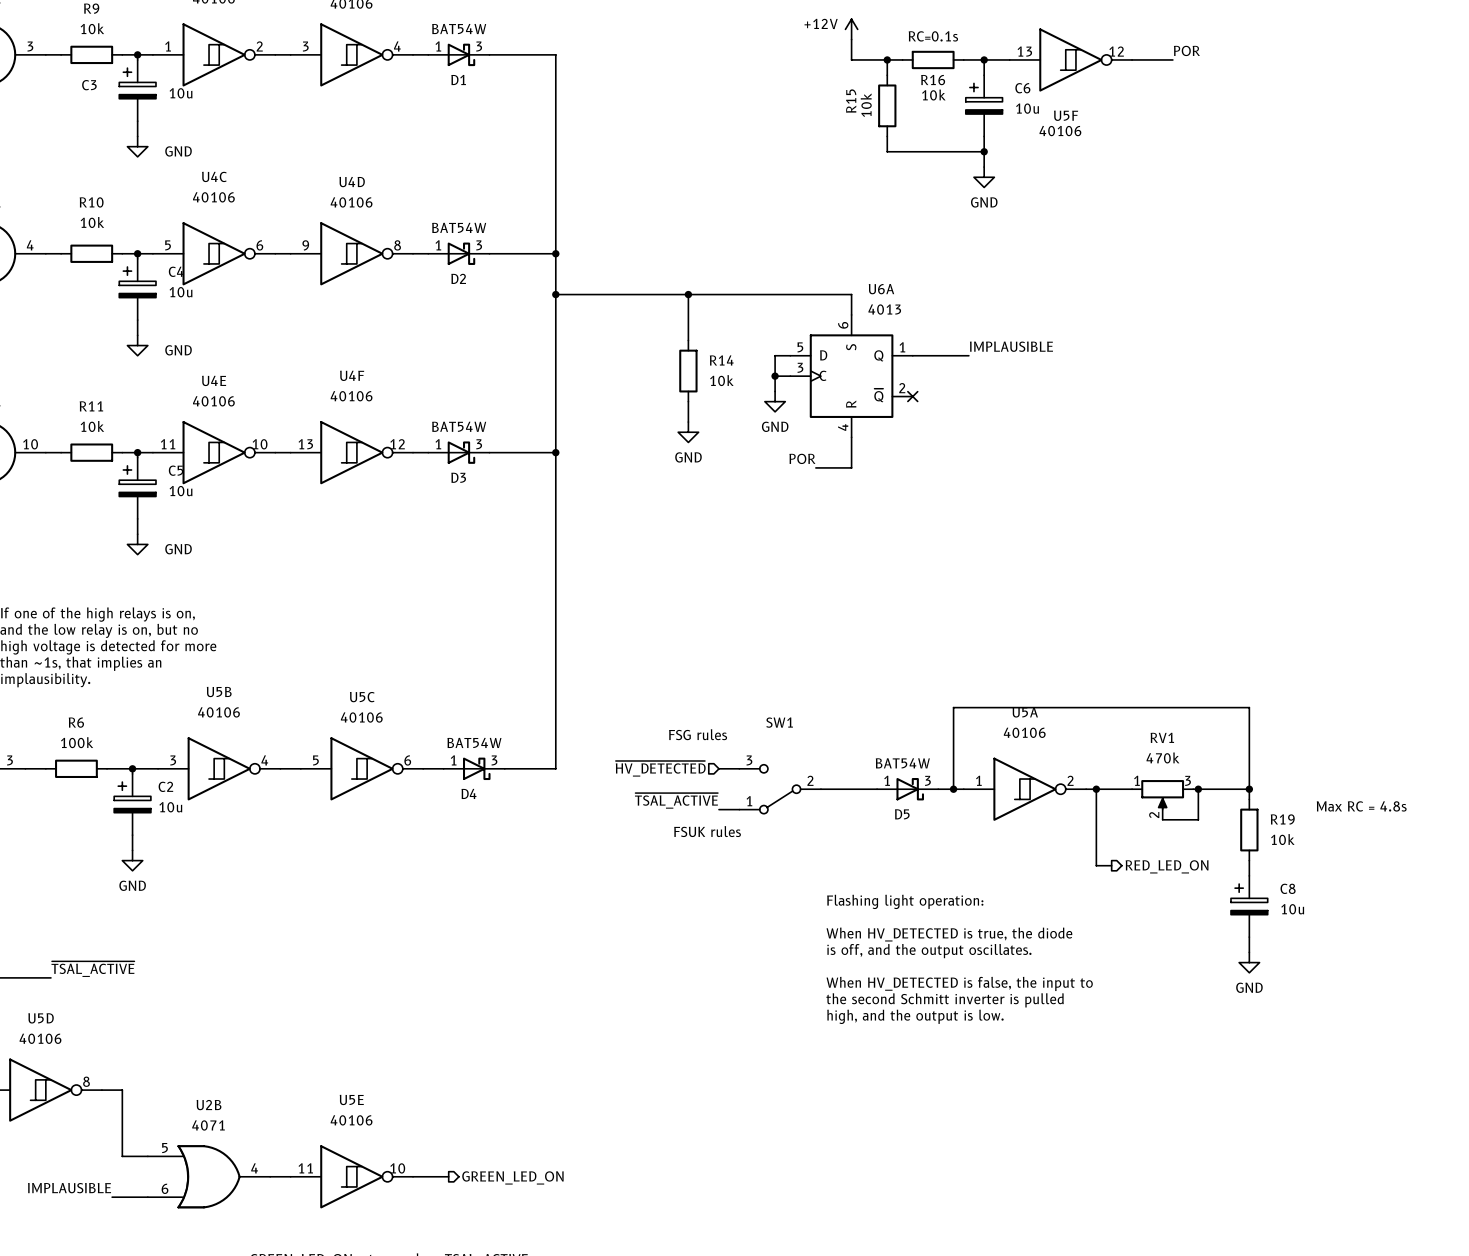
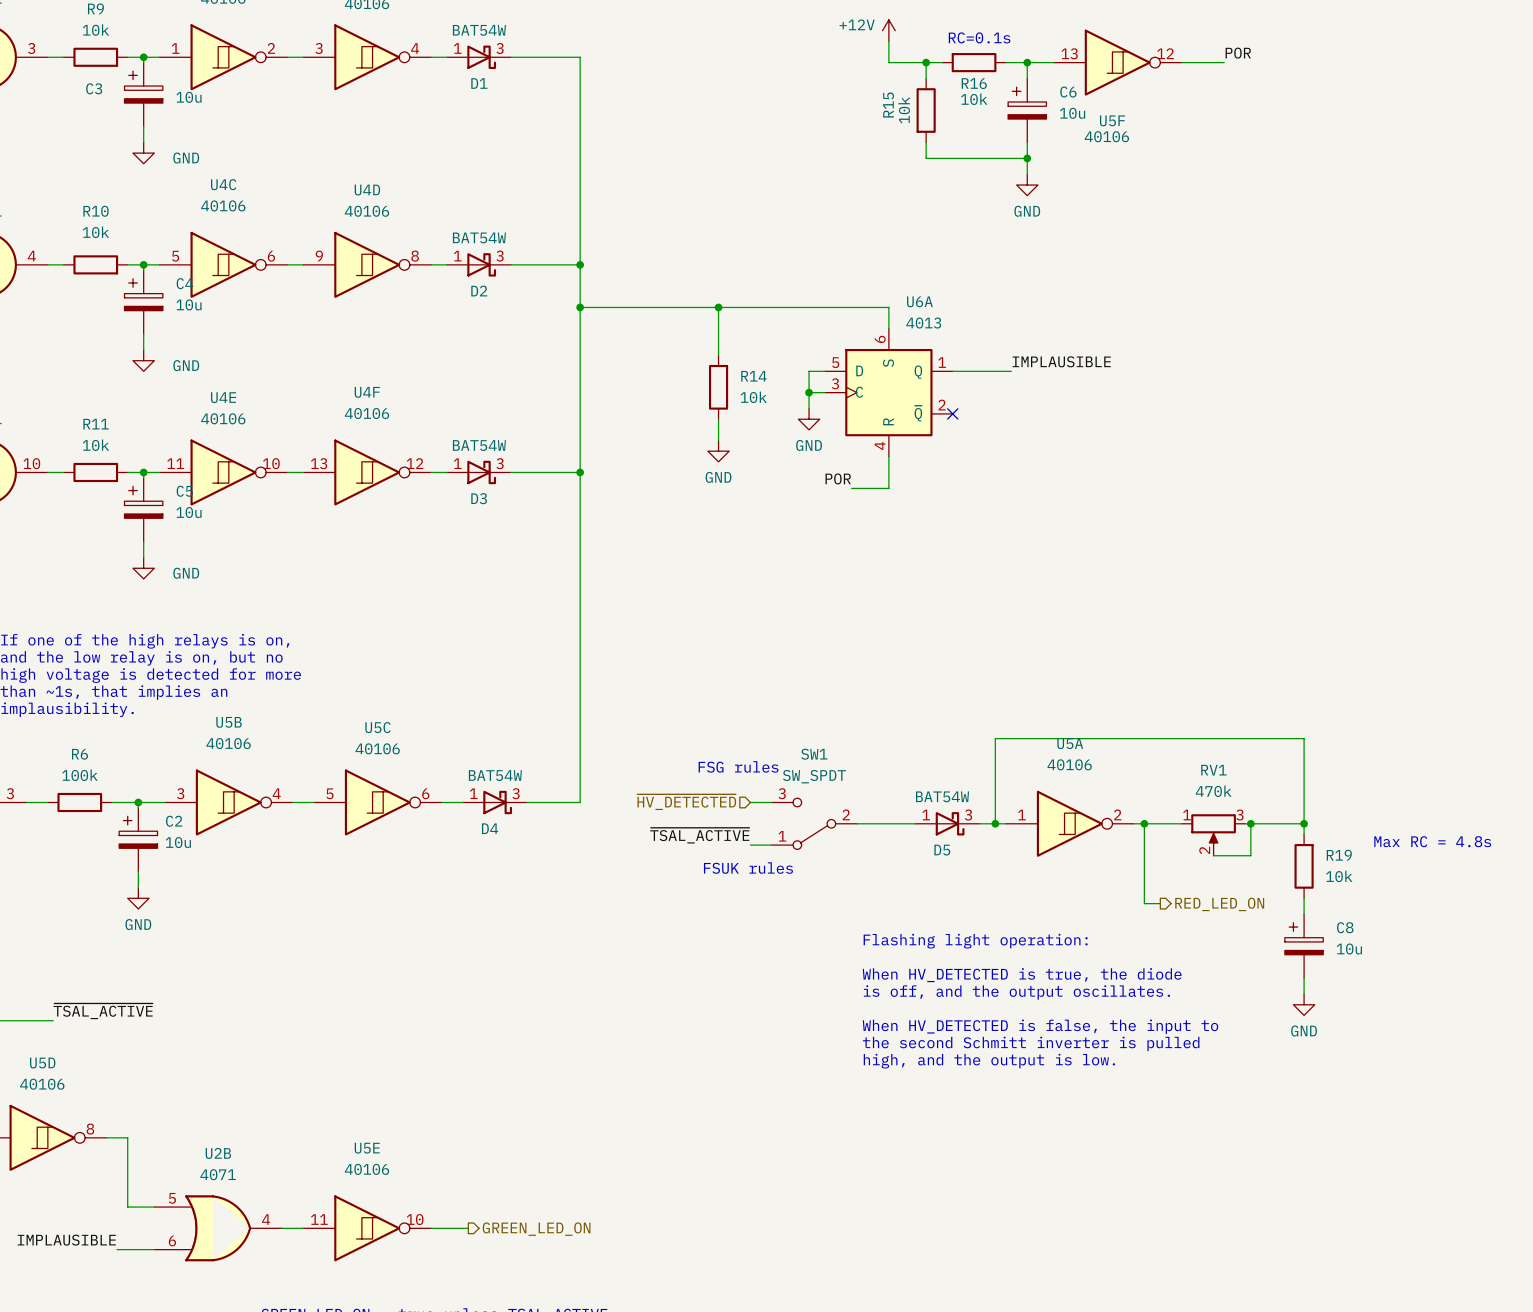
SW1 value: none -> SW_SPDT (814, 776)

